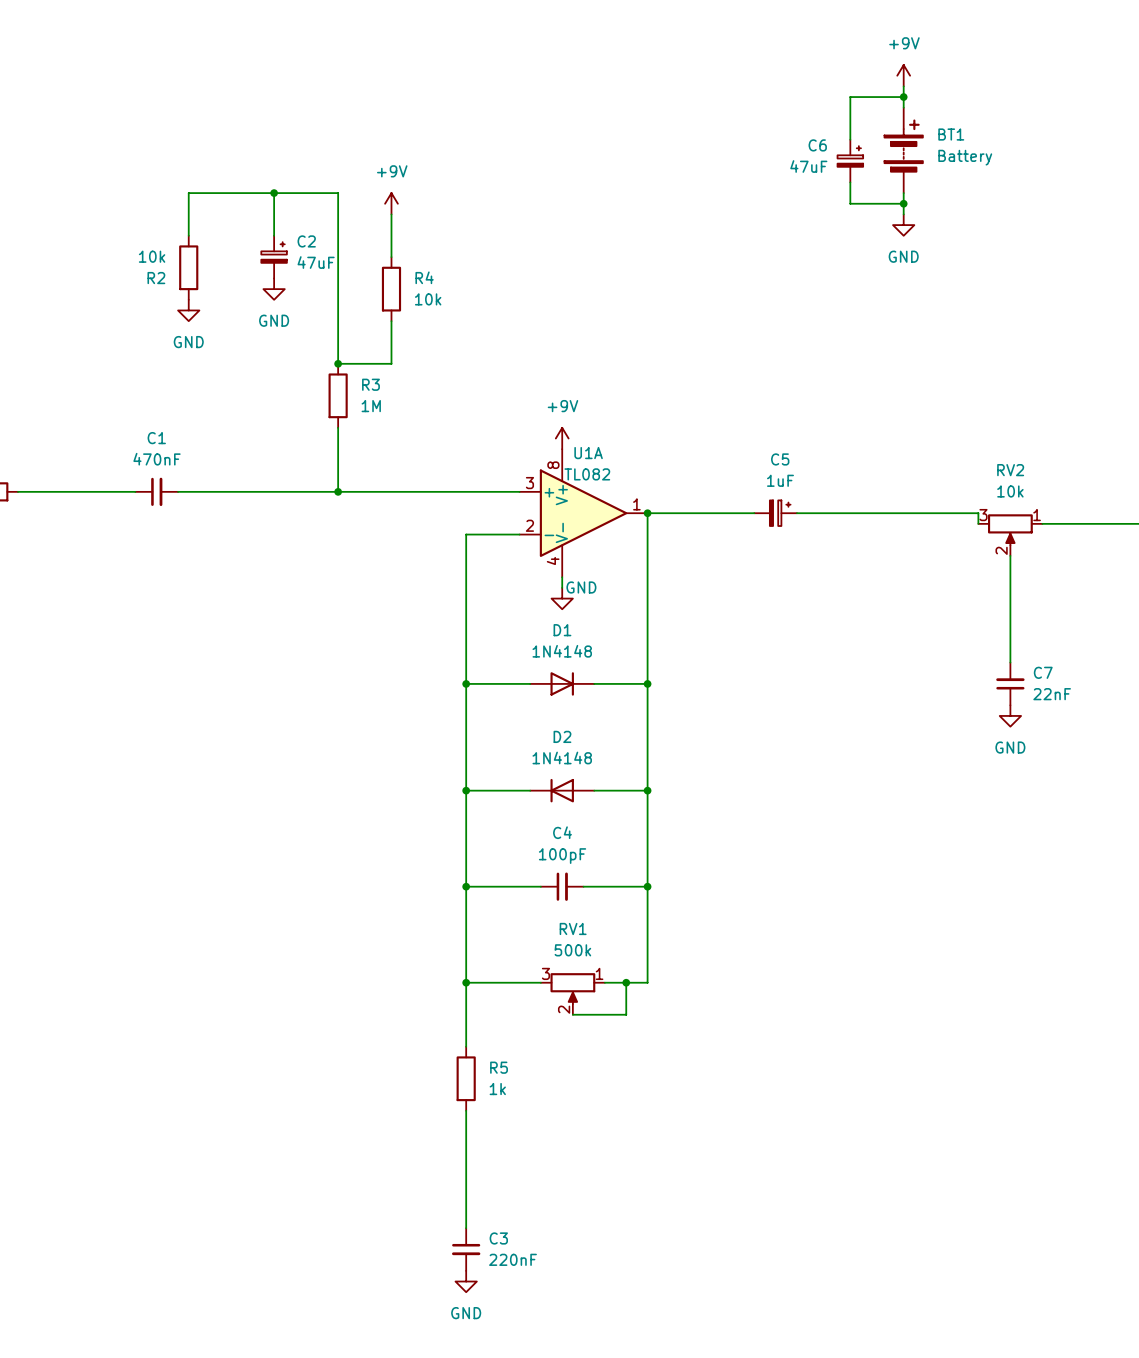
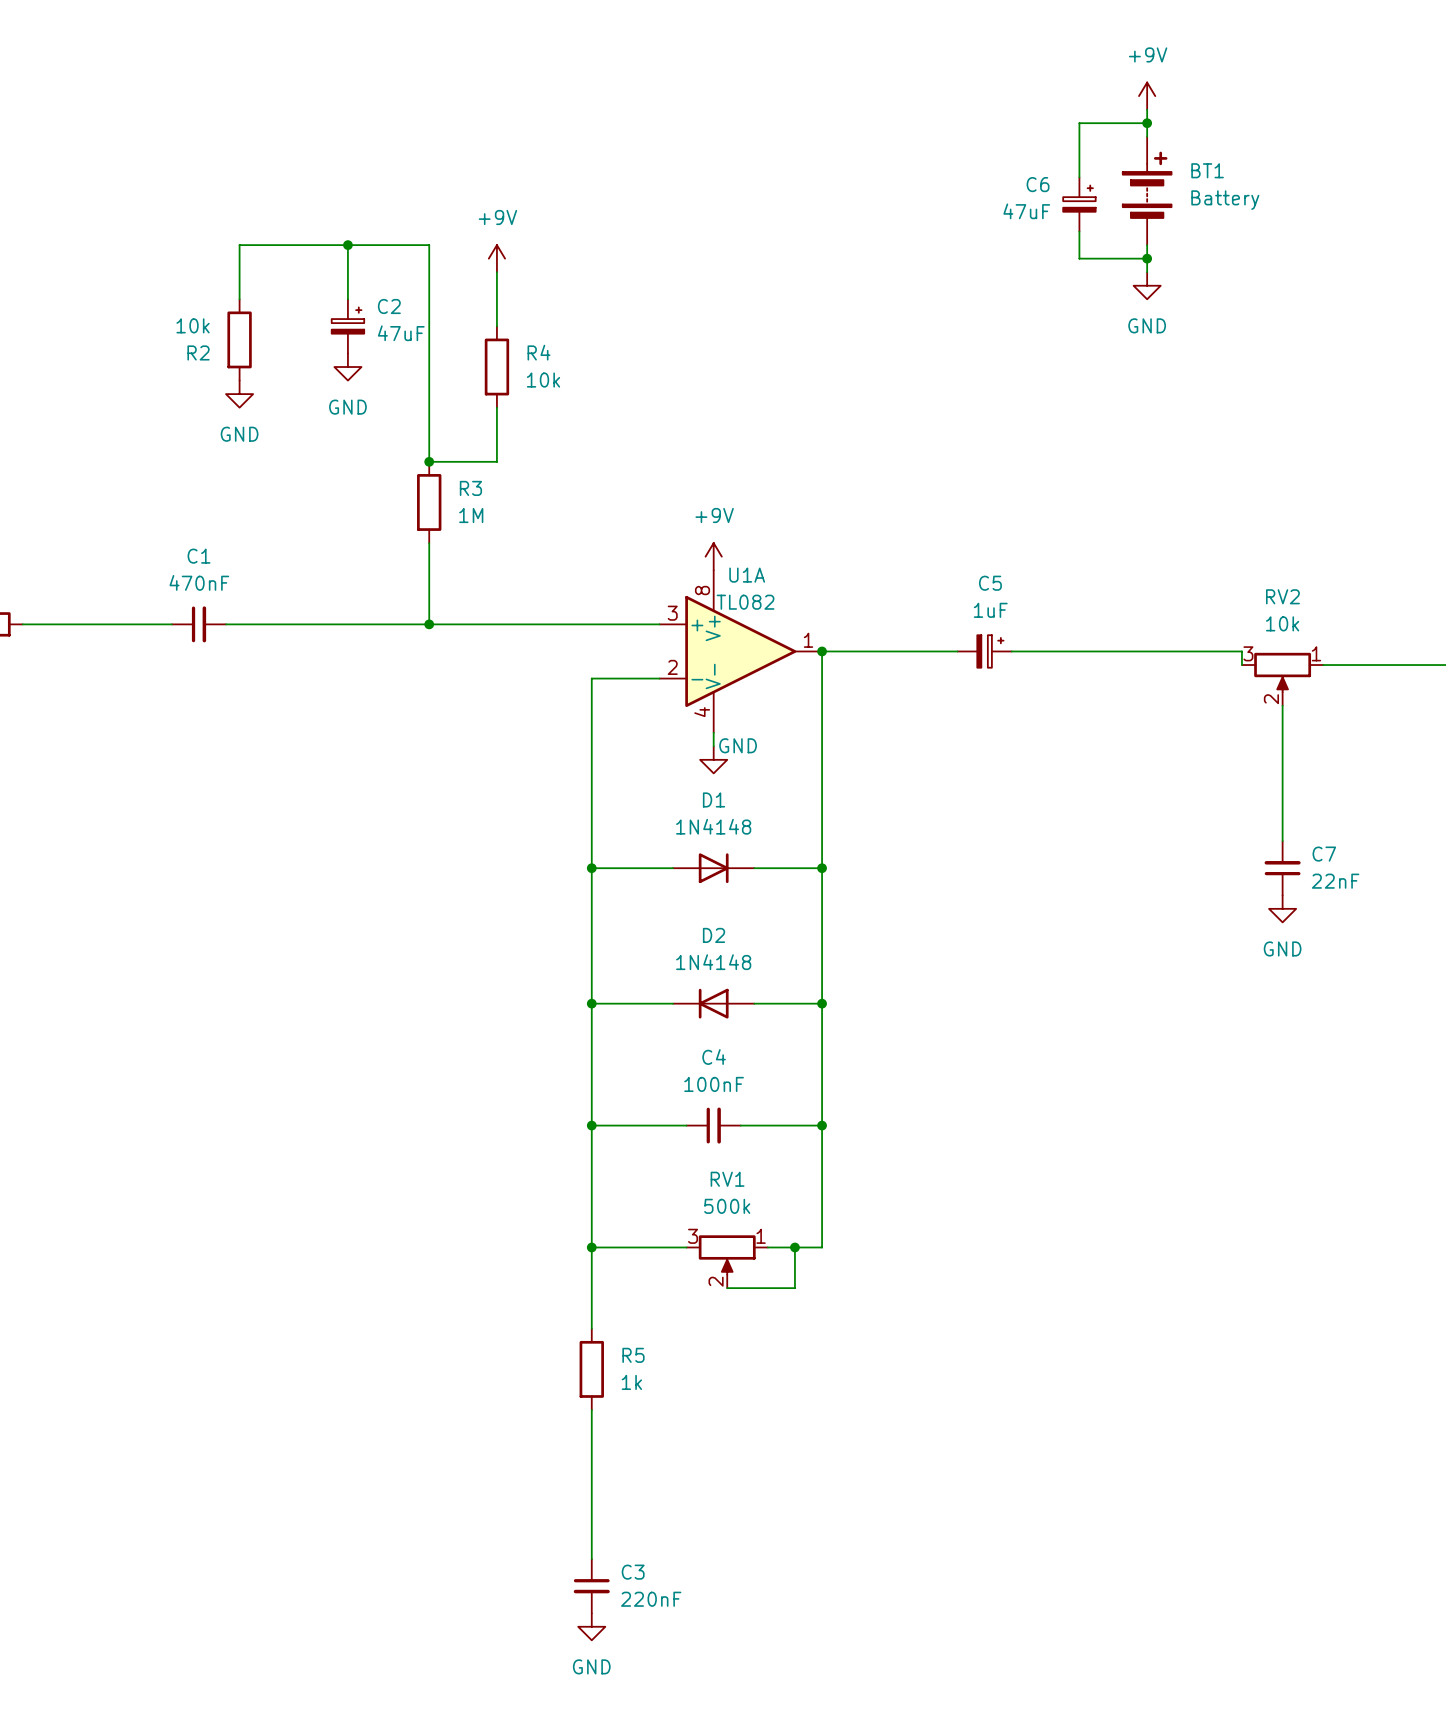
C4 value: 100pF (562, 856) -> 100nF (714, 1084)

